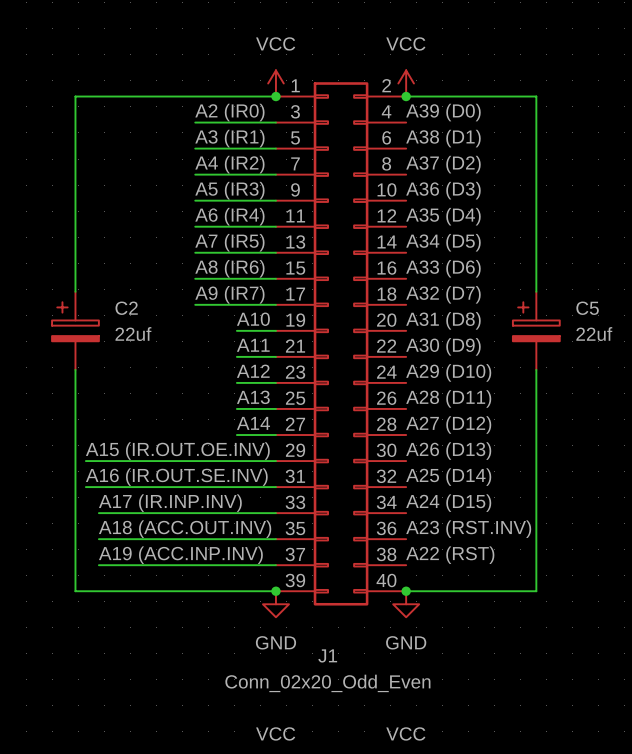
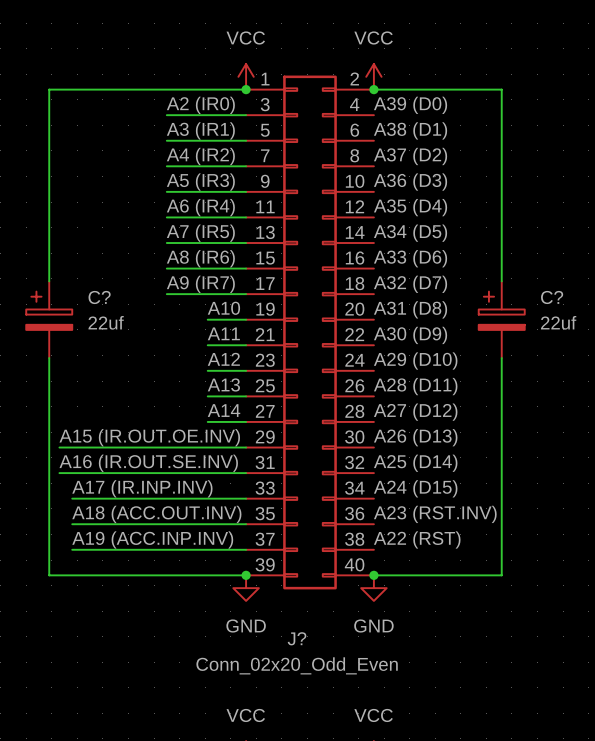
C2 name: C2 (126, 308) -> C? (99, 297)
C5 name: C5 (587, 308) -> C? (552, 297)
J1 name: J1 (327, 655) -> J? (297, 638)

